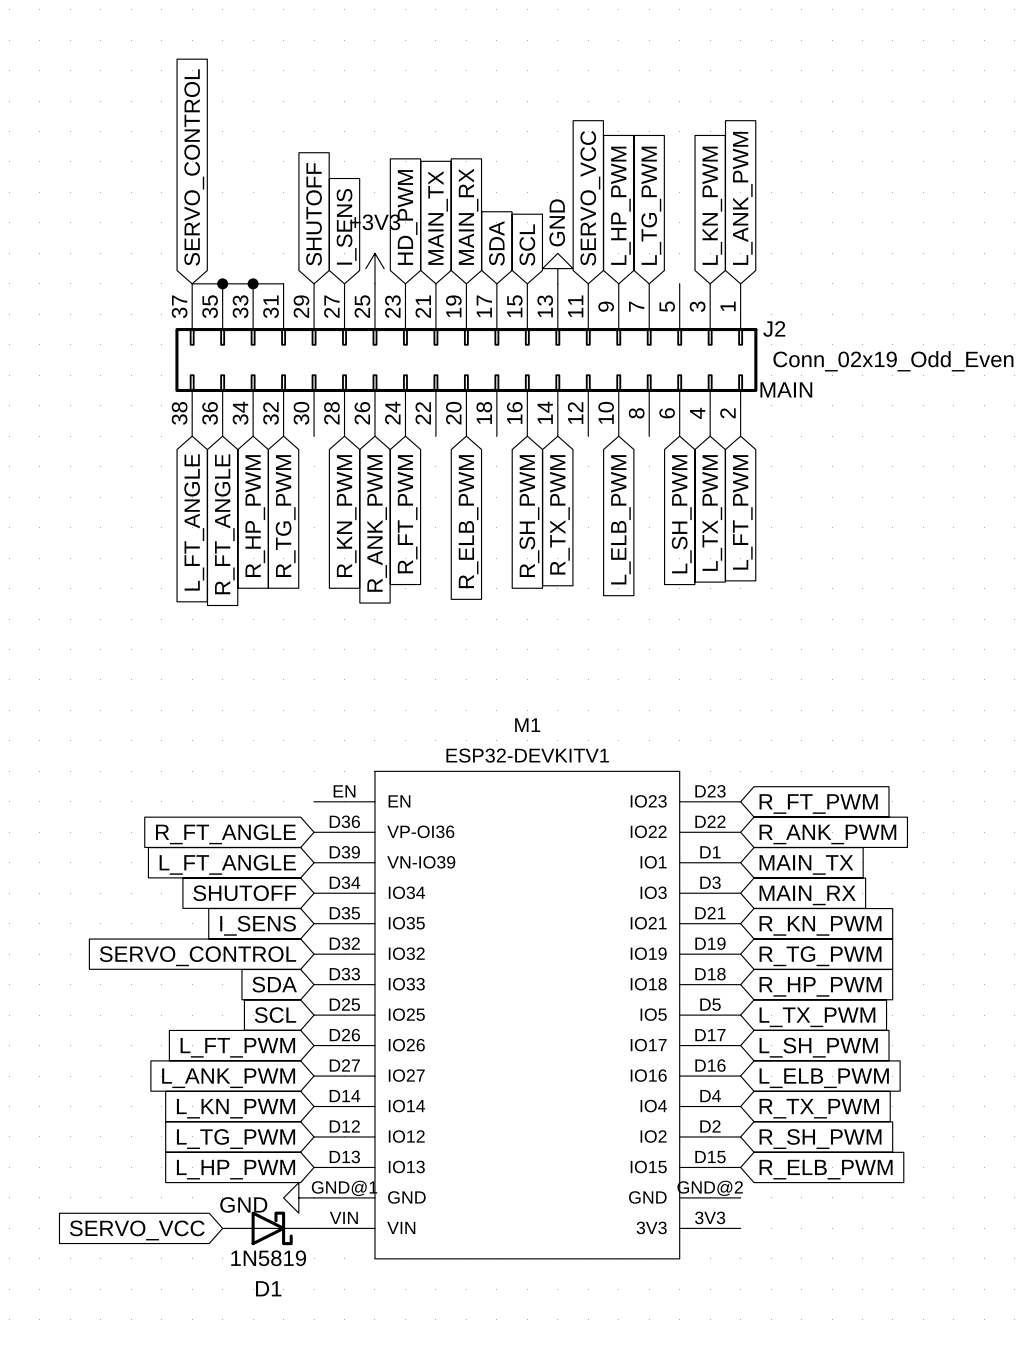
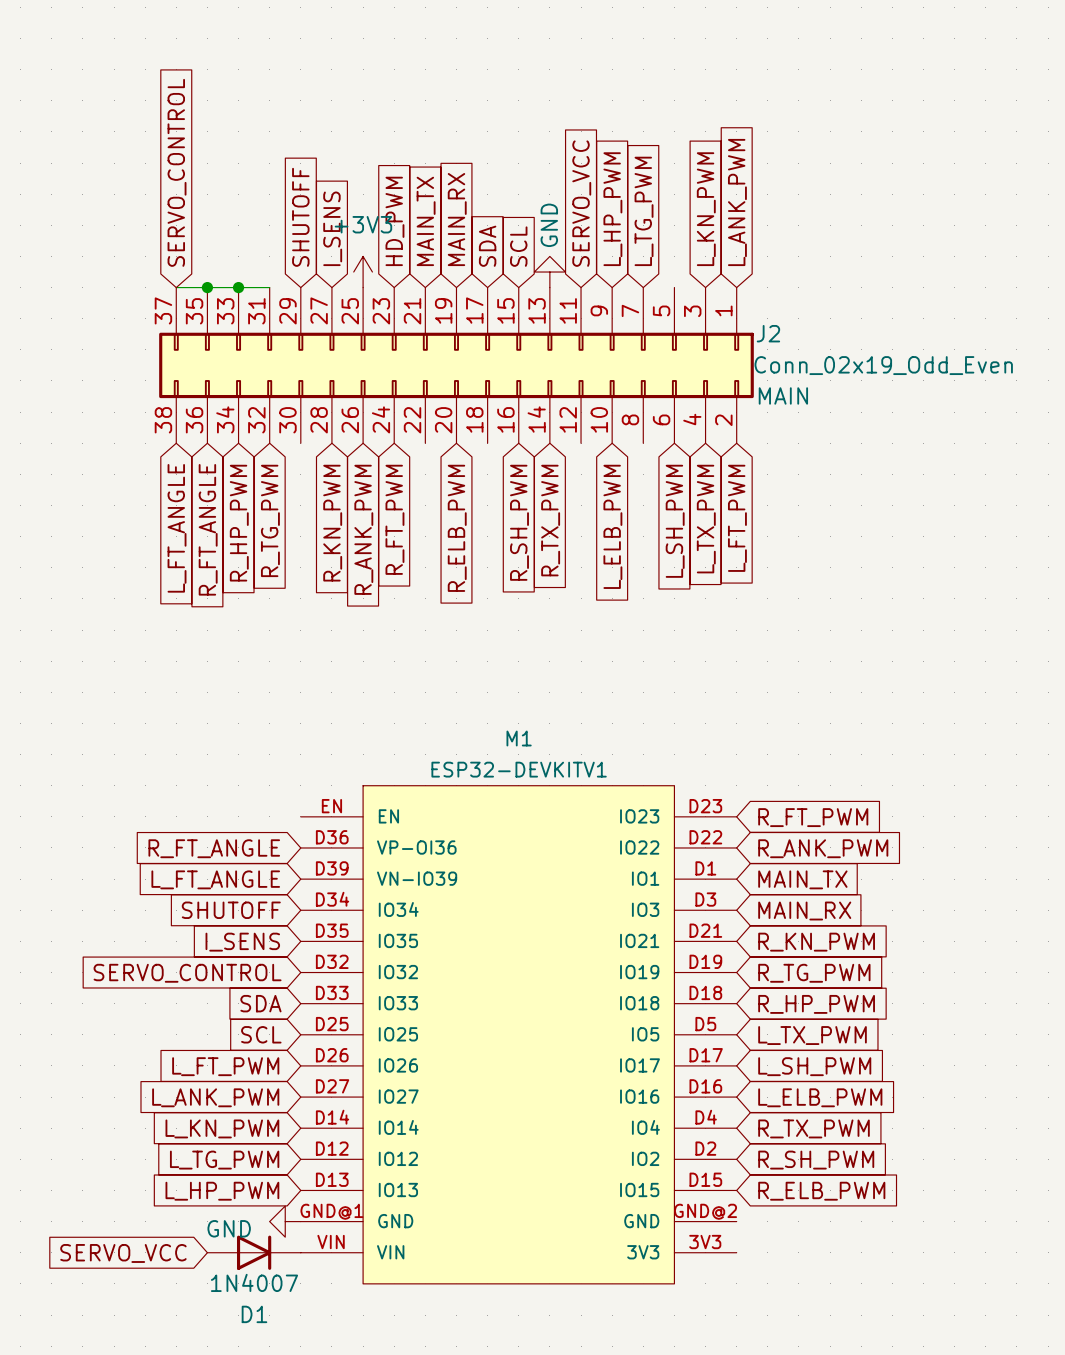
D1 symbol: [222, 1211, 315, 1246] -> [207, 1235, 301, 1270]
D1 value: 1N5819 (268, 1258) -> 1N4007 (254, 1282)

